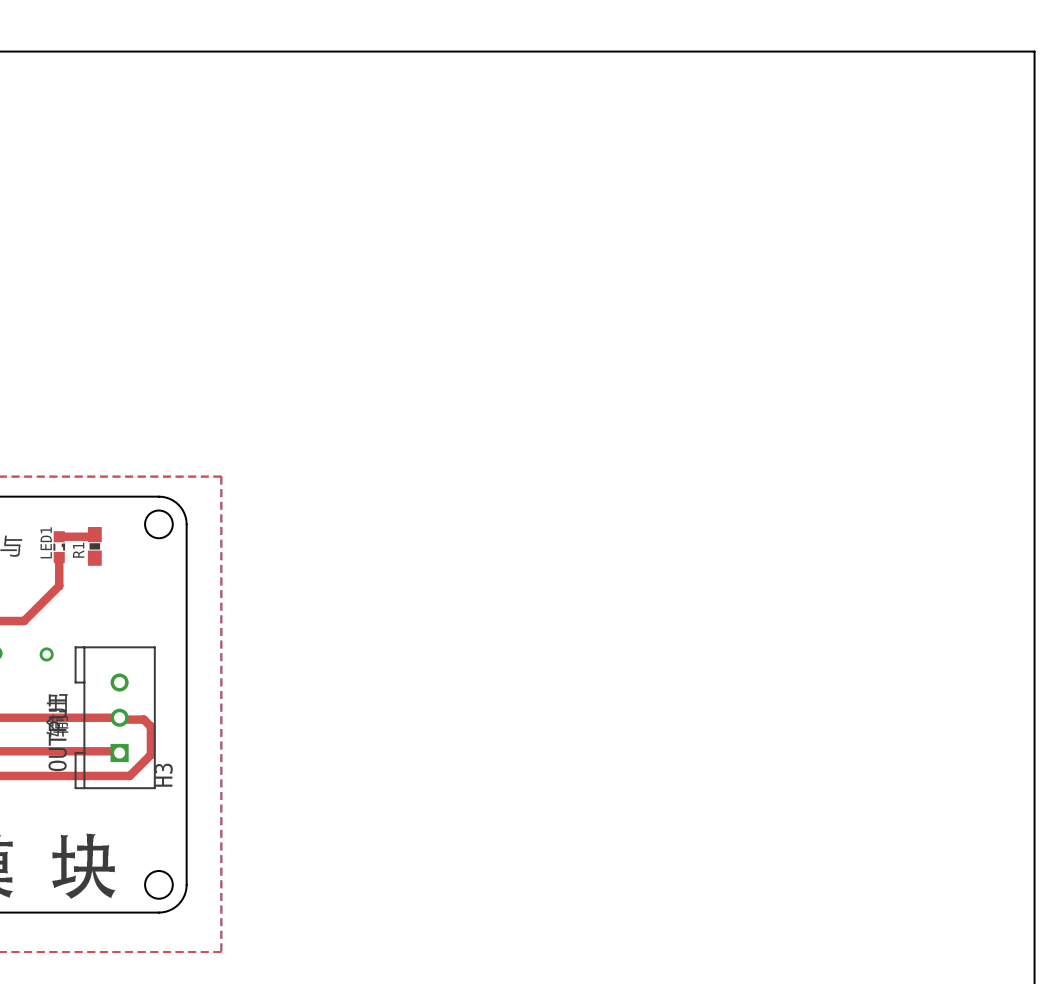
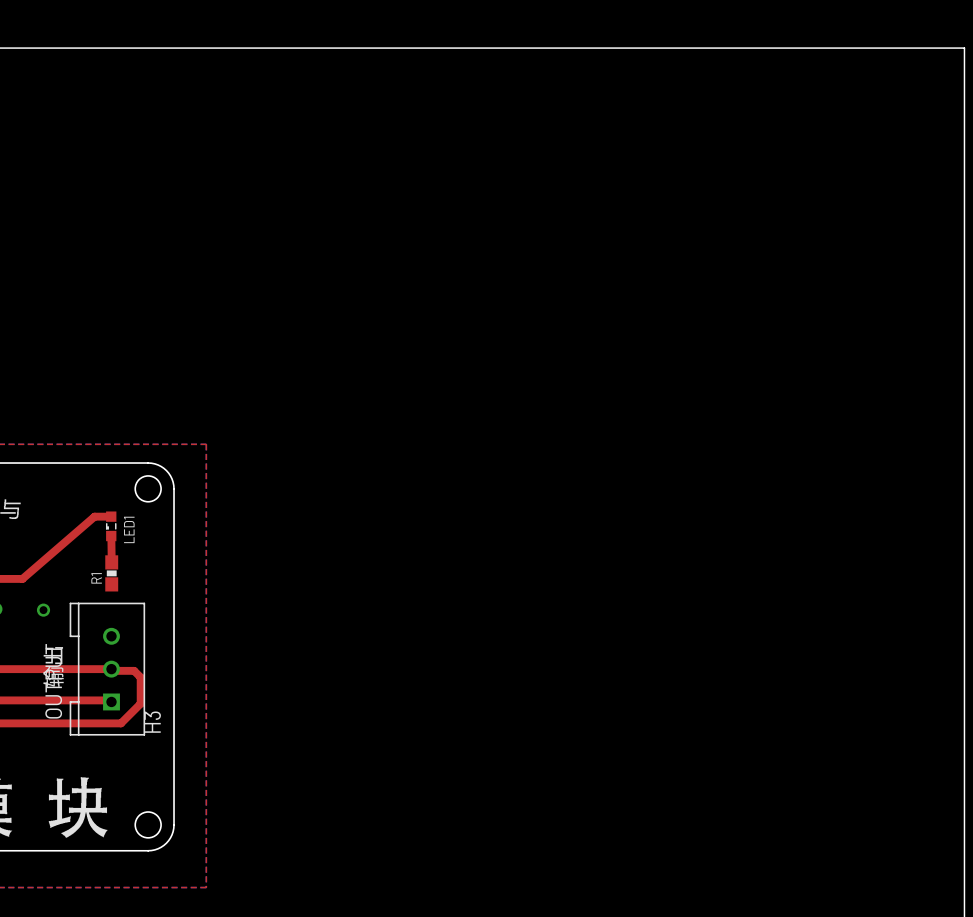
top track: (94, 534) (92, 536) (59, 536) -> none
R1 position: (94, 546) -> (111, 573)
LED1 rotation: 0° (59, 547) -> 180° (111, 526)
LED1 position: (59, 547) -> (111, 526)
top track: (59, 557) (59, 585) (24, 621) -> (111, 516) (94, 516) (22, 578)
top track: none -> (111, 537) (111, 562)

